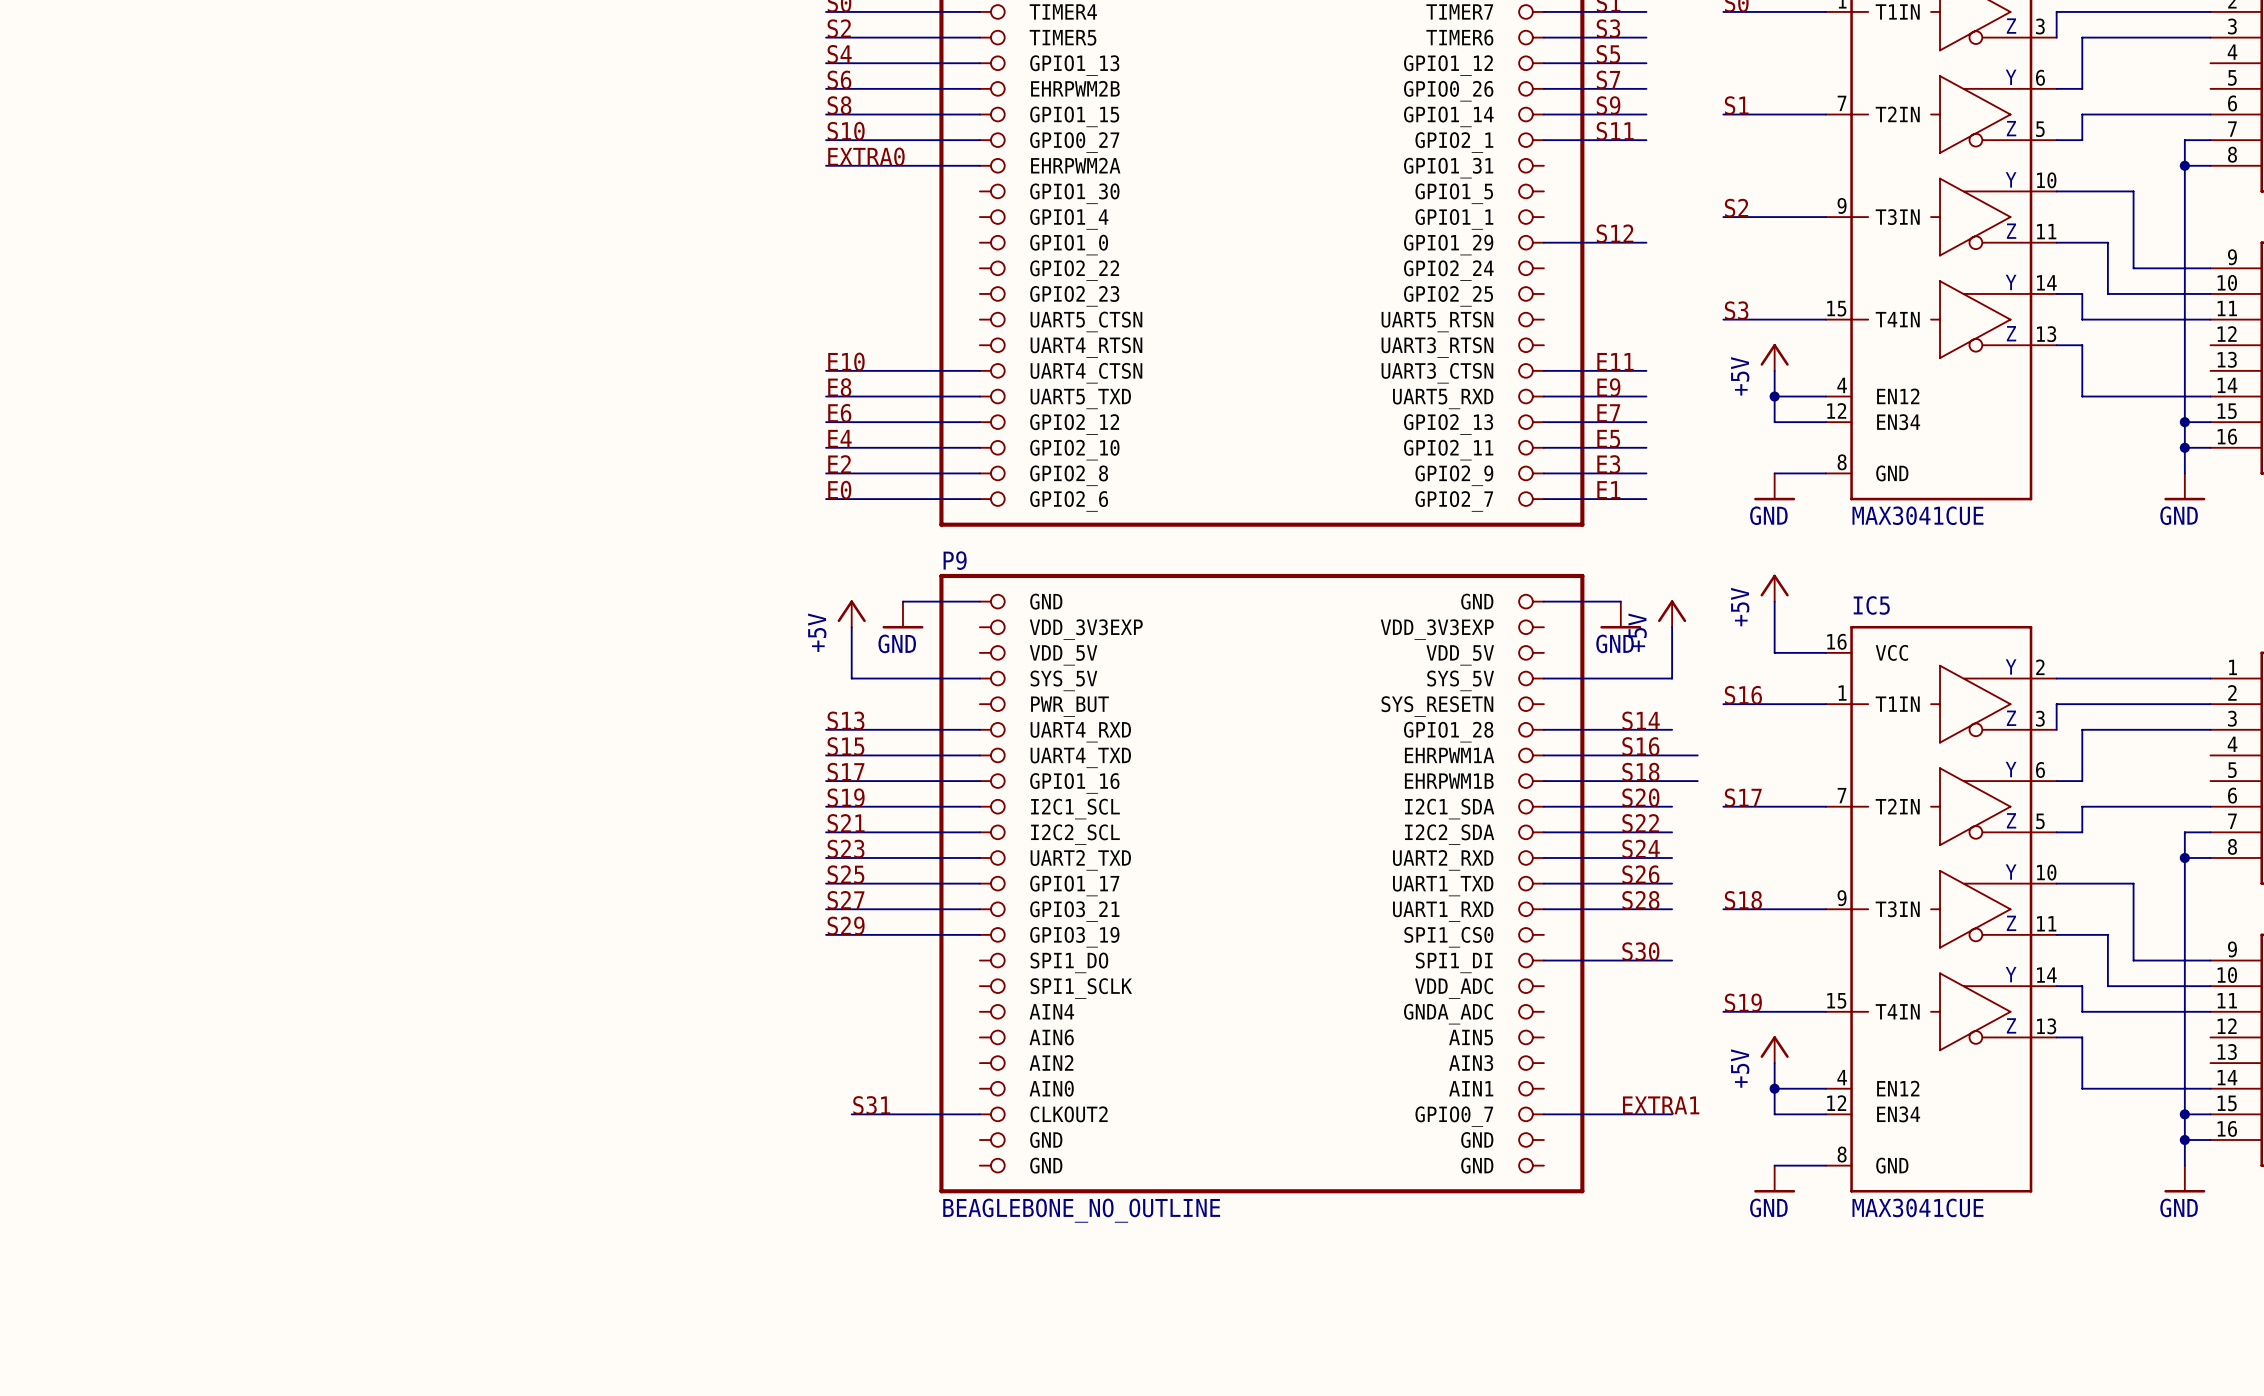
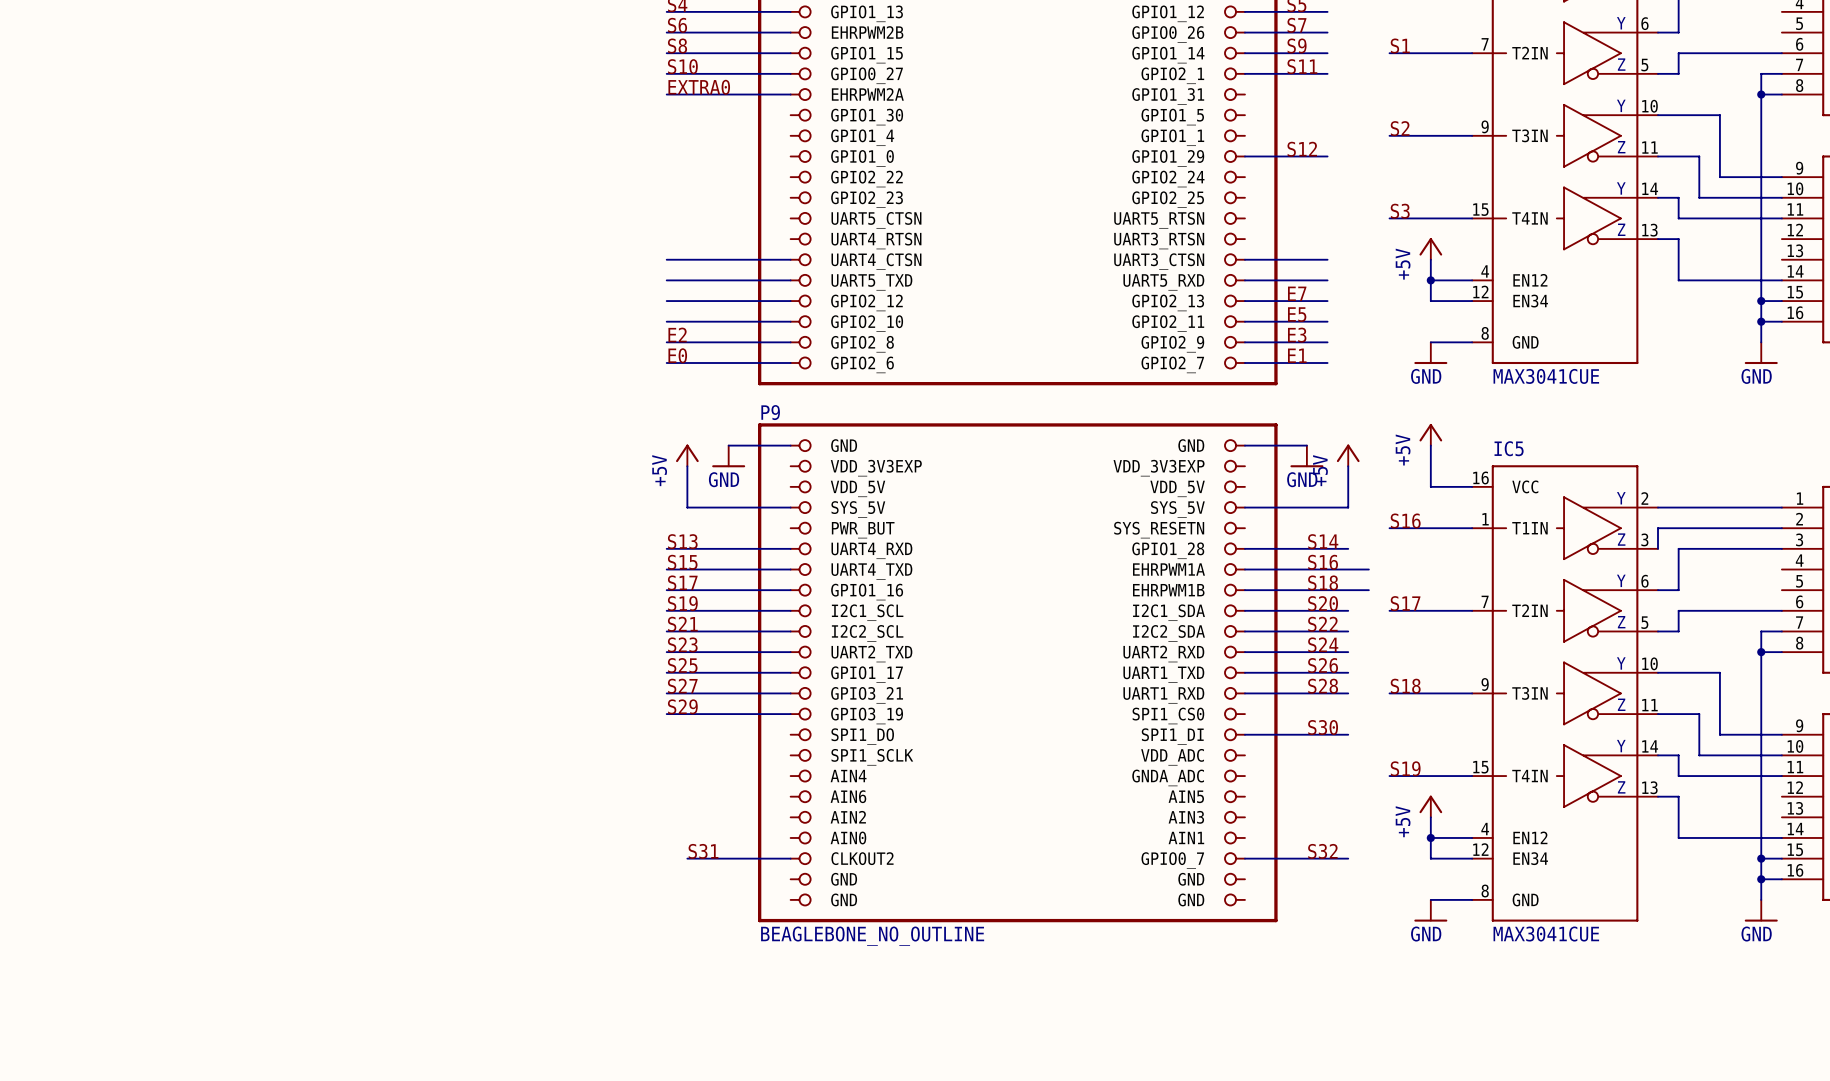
label: E10 (846, 361) -> none
label: E11 (1615, 361) -> none
label: E8 (839, 387) -> none
label: E9 (1608, 387) -> none
label: E6 (839, 413) -> none
label: E4 (839, 438) -> none
label: EXTRA1 (1661, 1105) -> S32 (1322, 851)

